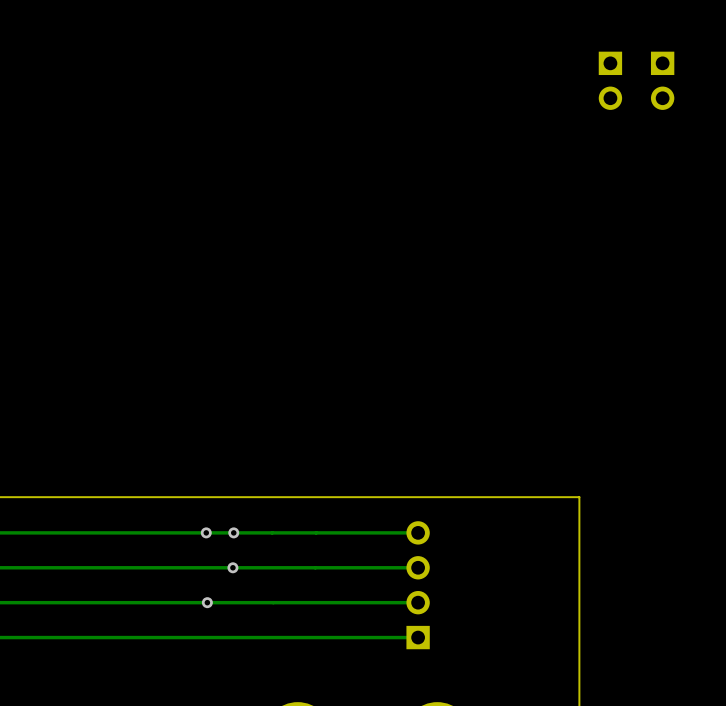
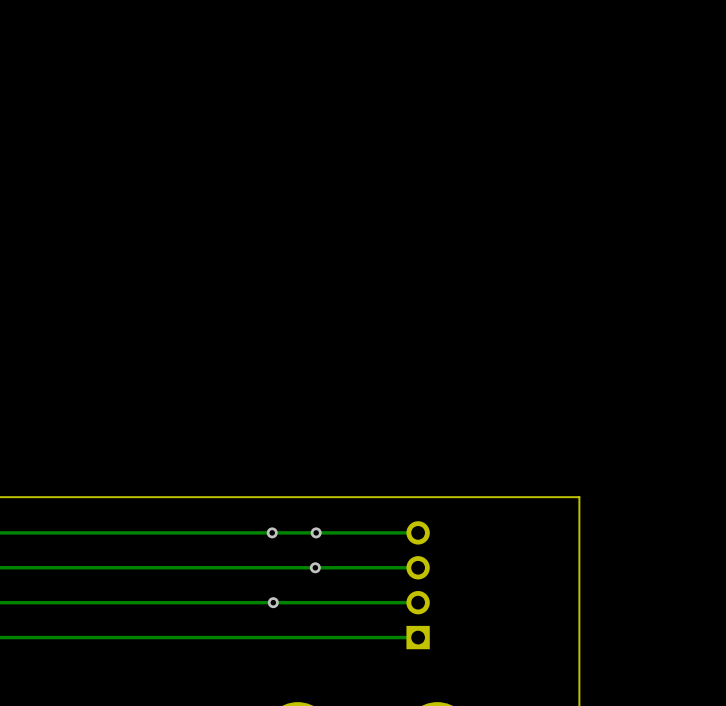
part: (610, 80) -> none
part: (662, 80) -> none
via: (206, 532) -> none
via: (233, 532) -> none
via: none -> (272, 532)
via: none -> (316, 532)
via: (232, 567) -> none
via: none -> (315, 567)
via: (207, 602) -> none
via: none -> (273, 602)

